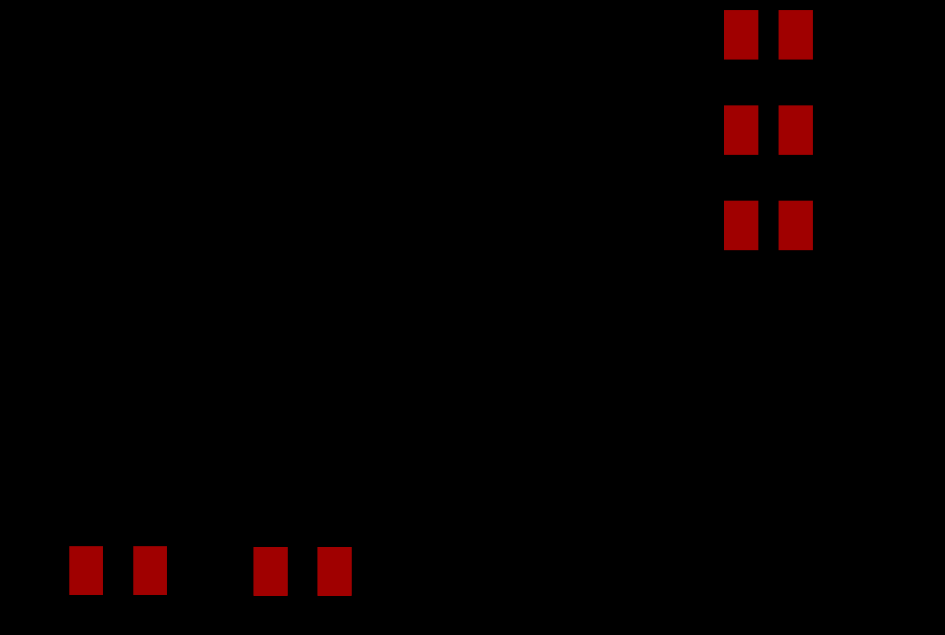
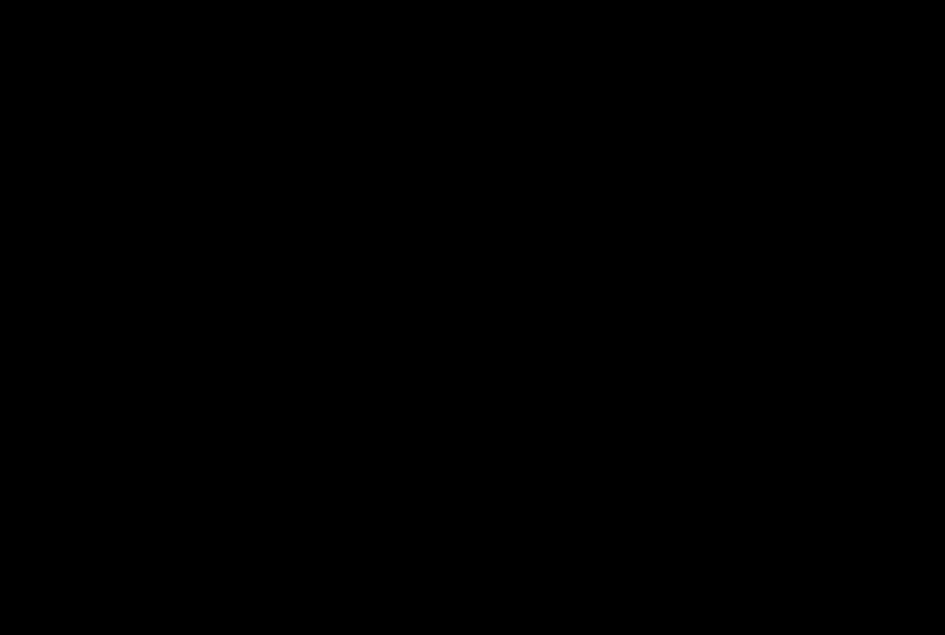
part: (768, 34) -> none
part: (768, 130) -> none
part: (768, 225) -> none
part: (118, 570) -> none
part: (302, 571) -> none

